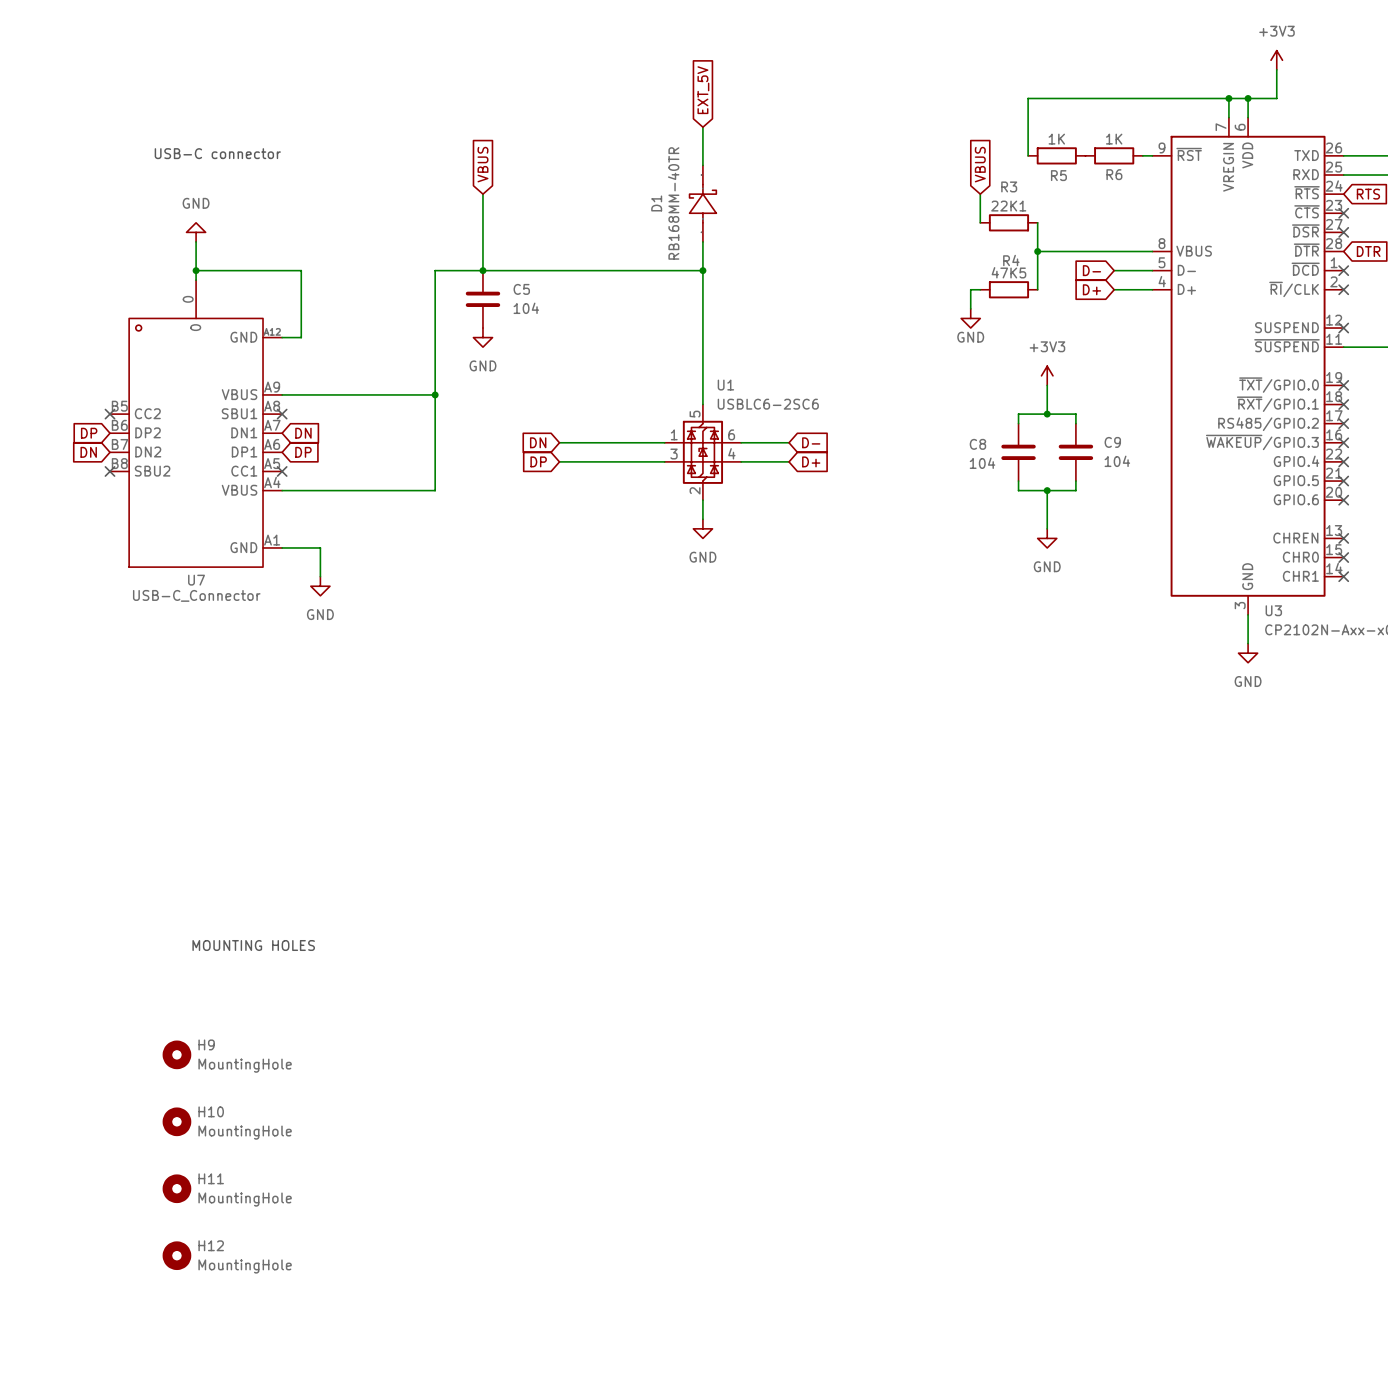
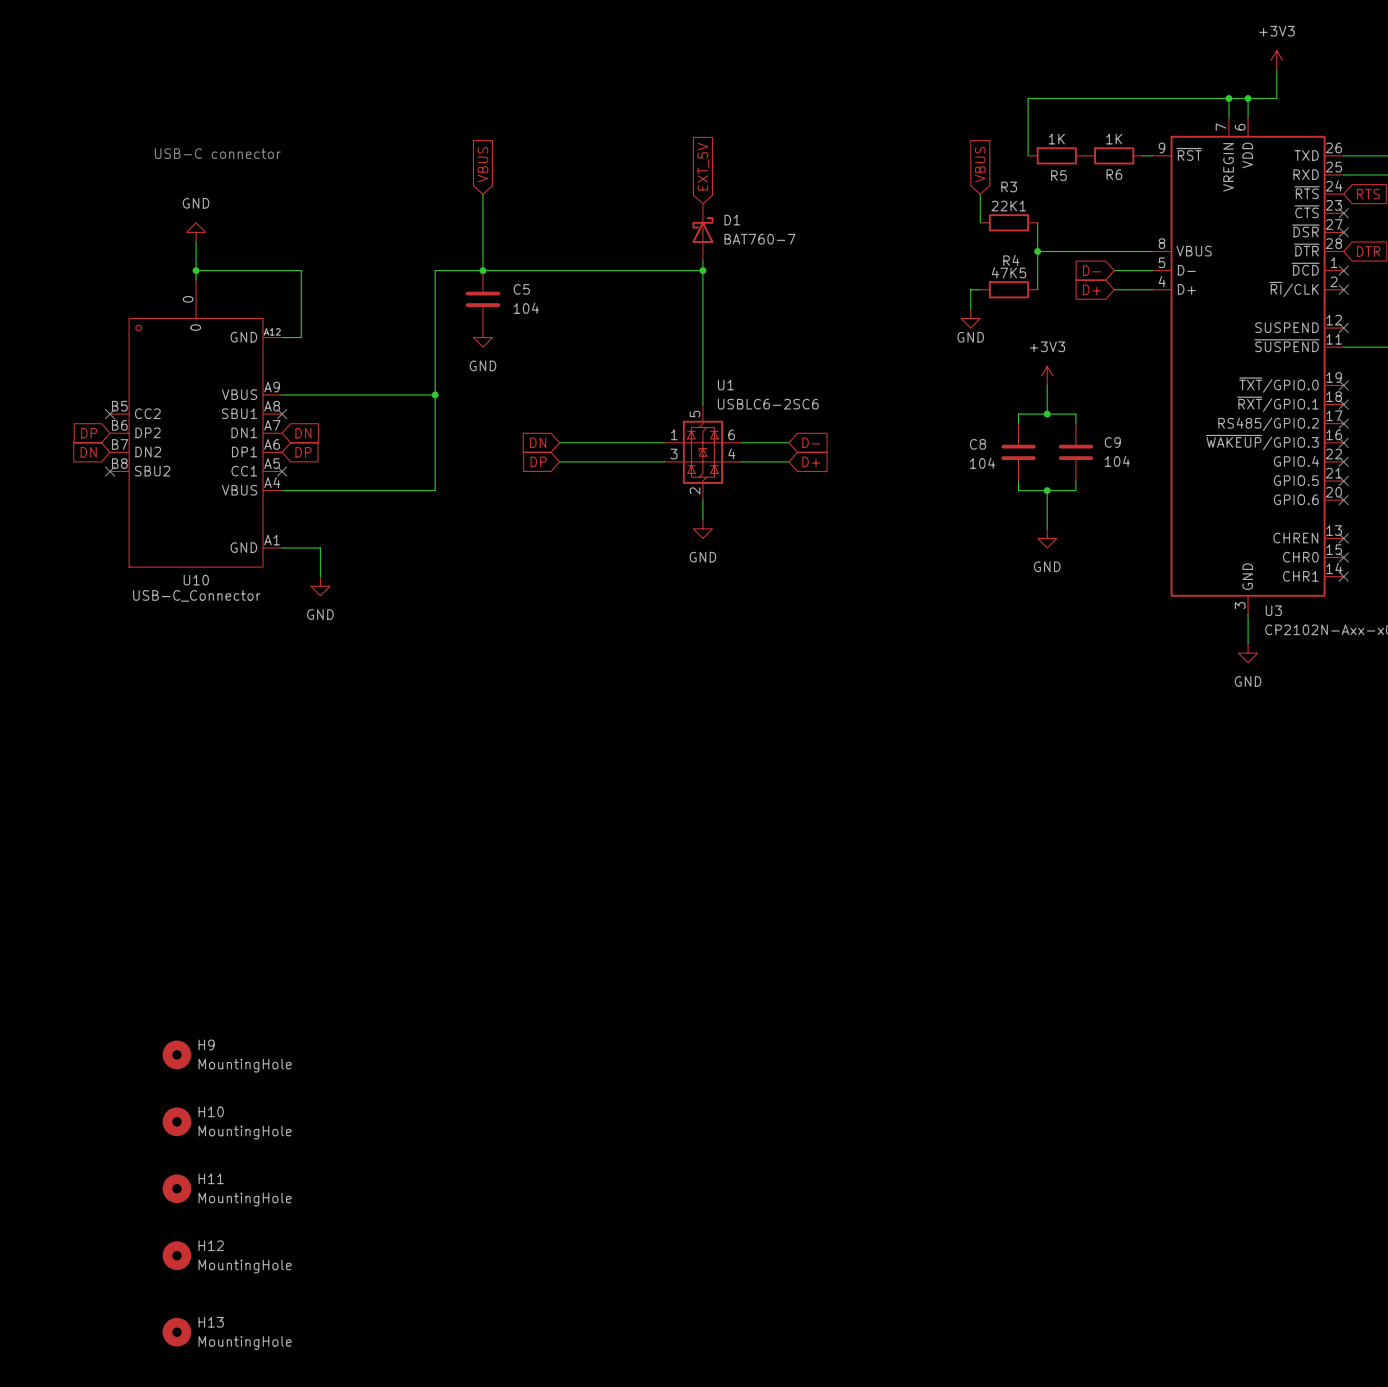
global label position: EXT_5V (703, 90) -> EXT_5V (703, 166)
wire: (702, 127) (702, 165) -> none
D1 symbol: [689, 165, 717, 242] -> [692, 203, 714, 262]
D1 name position: D1 (656, 203) -> D1 (732, 220)
D1 value: RB168MM-40TR (673, 203) -> BAT760-7 (759, 239)
U7 name: U7 (196, 580) -> U10 (196, 580)
text: MOUNTING HOLES (253, 945) -> none
H13: none -> MountingHole (176, 1332)

